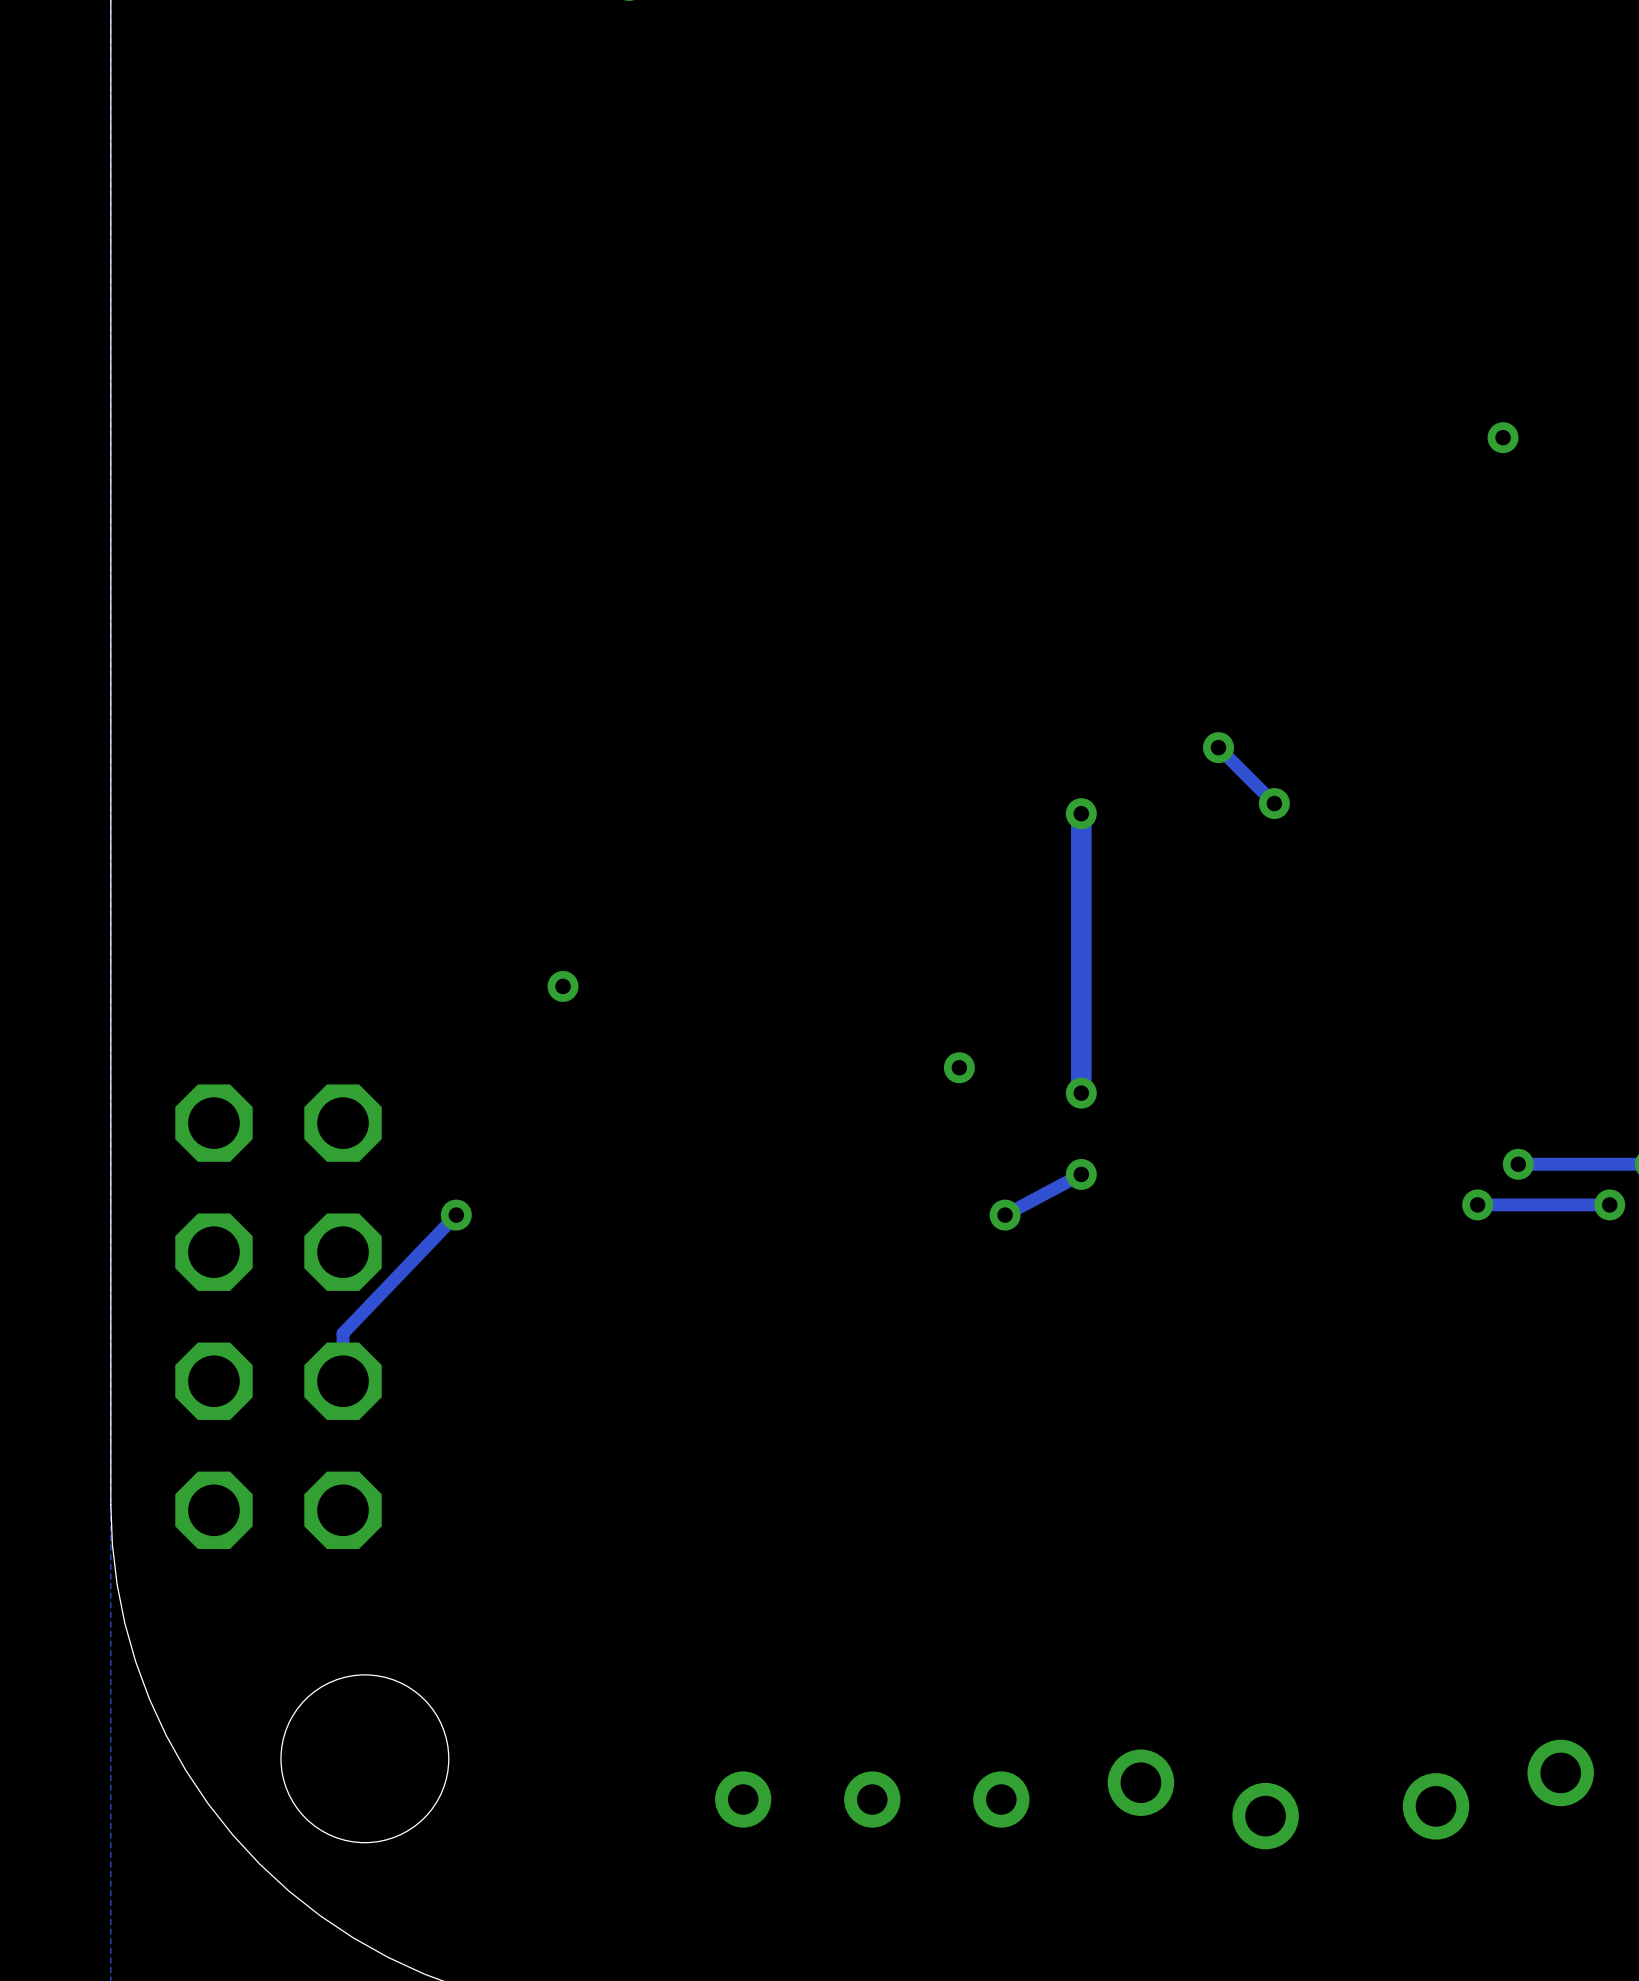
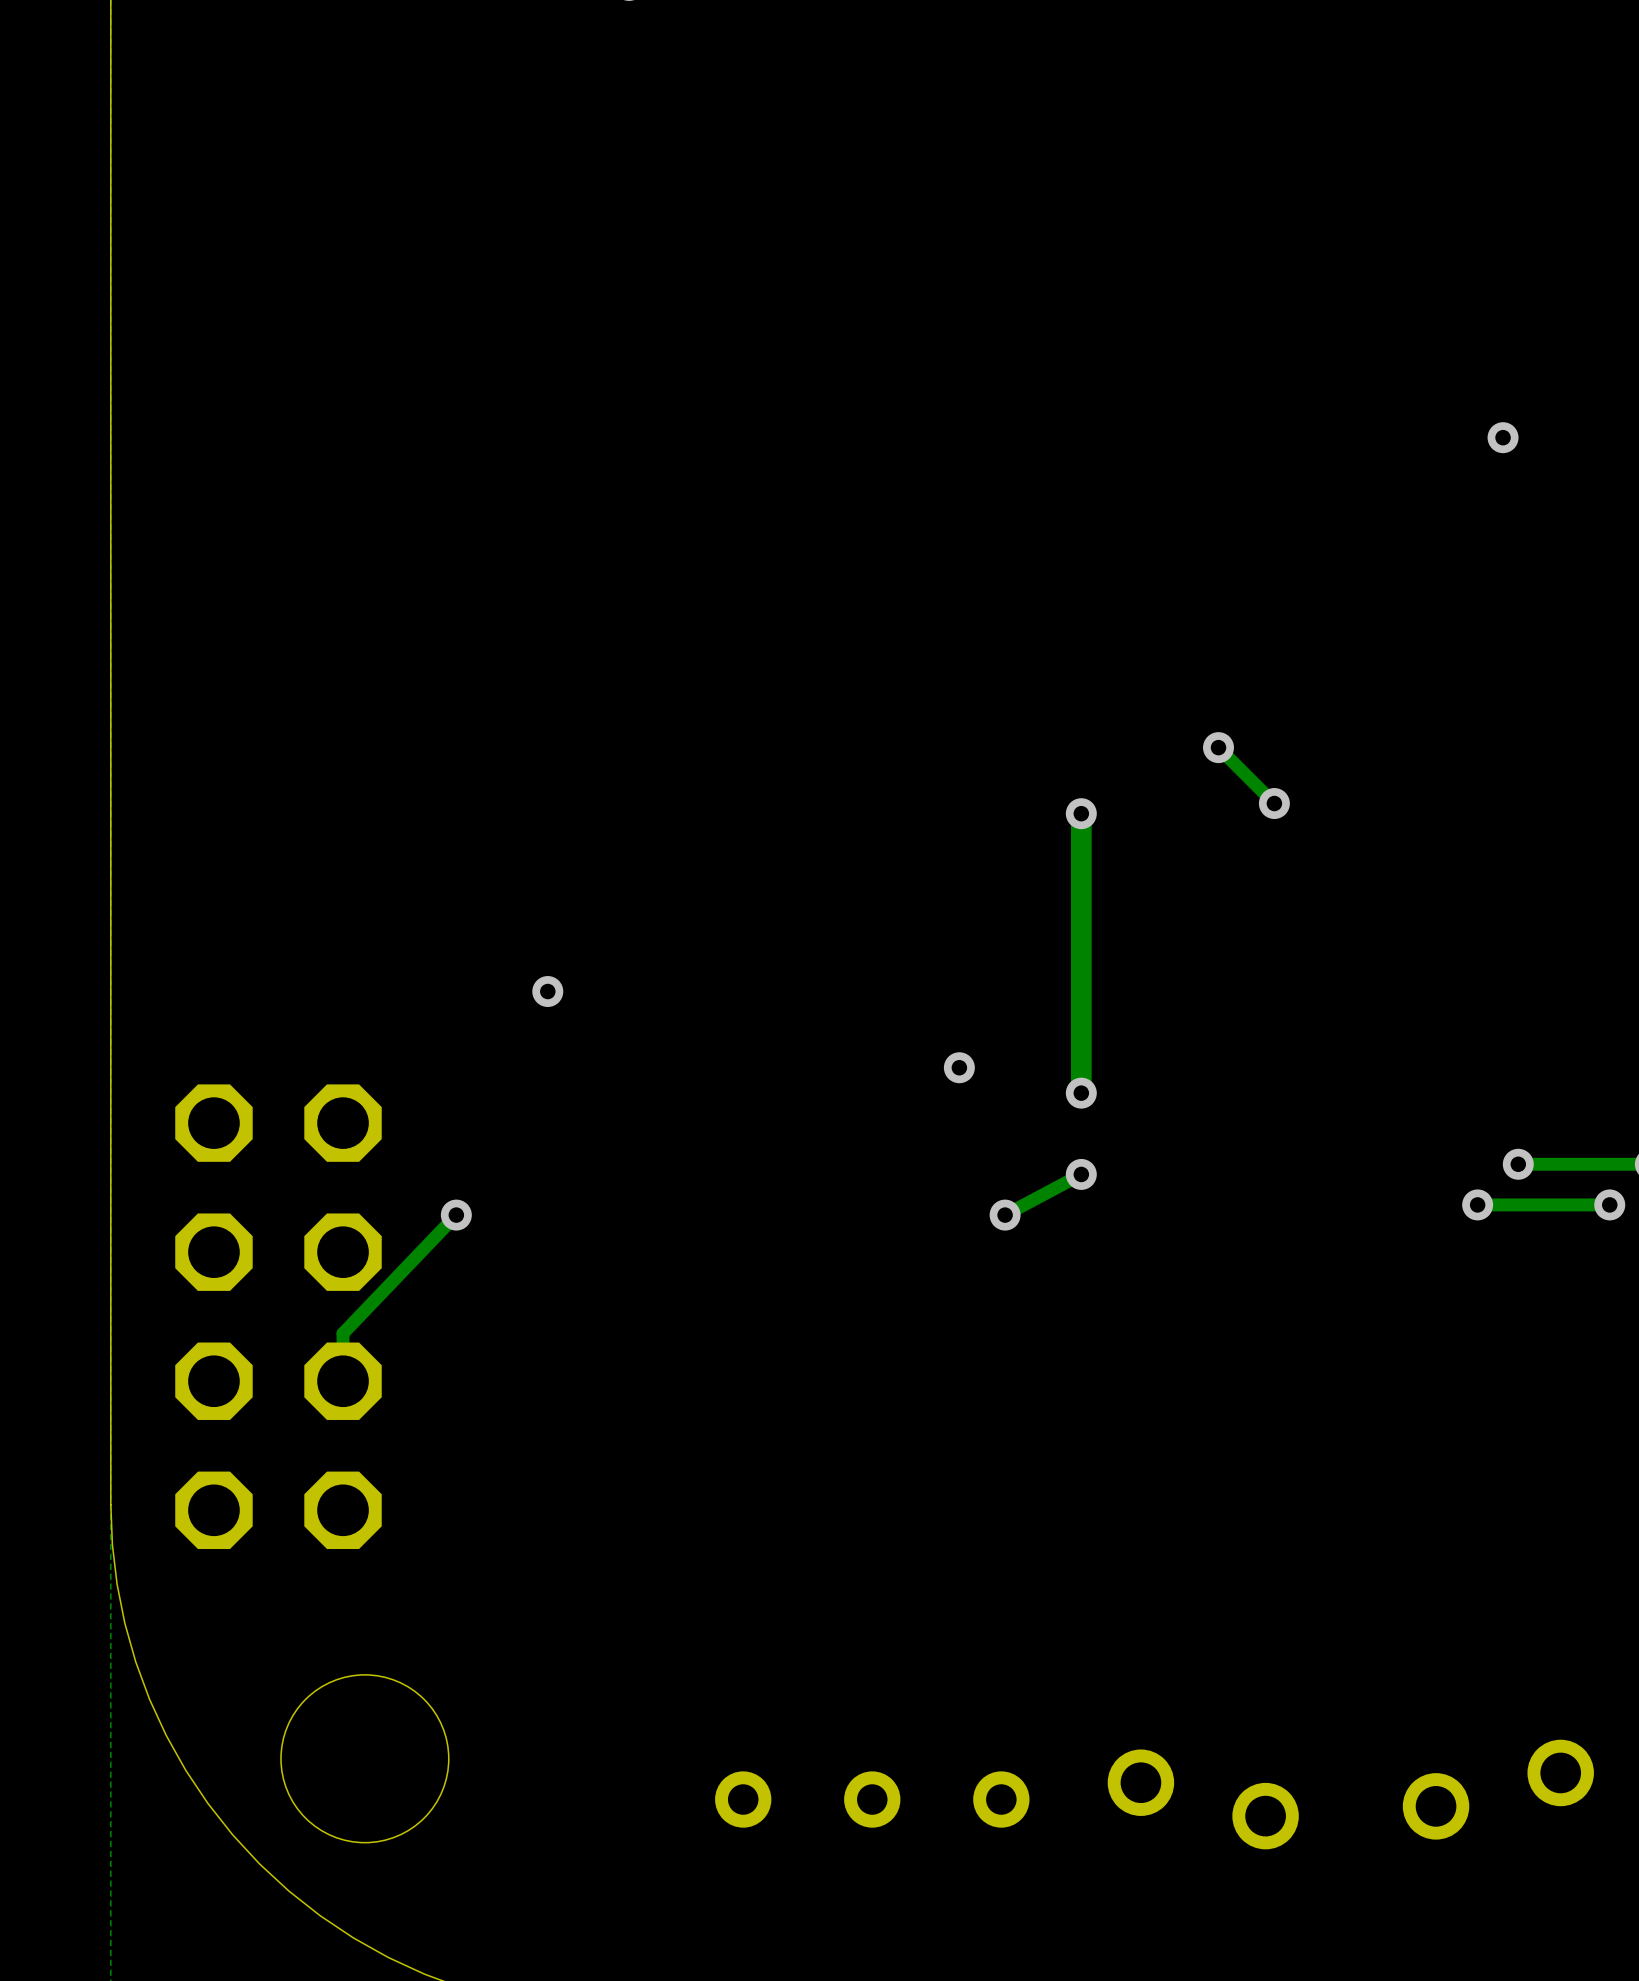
via position: (563, 986) -> (547, 991)

